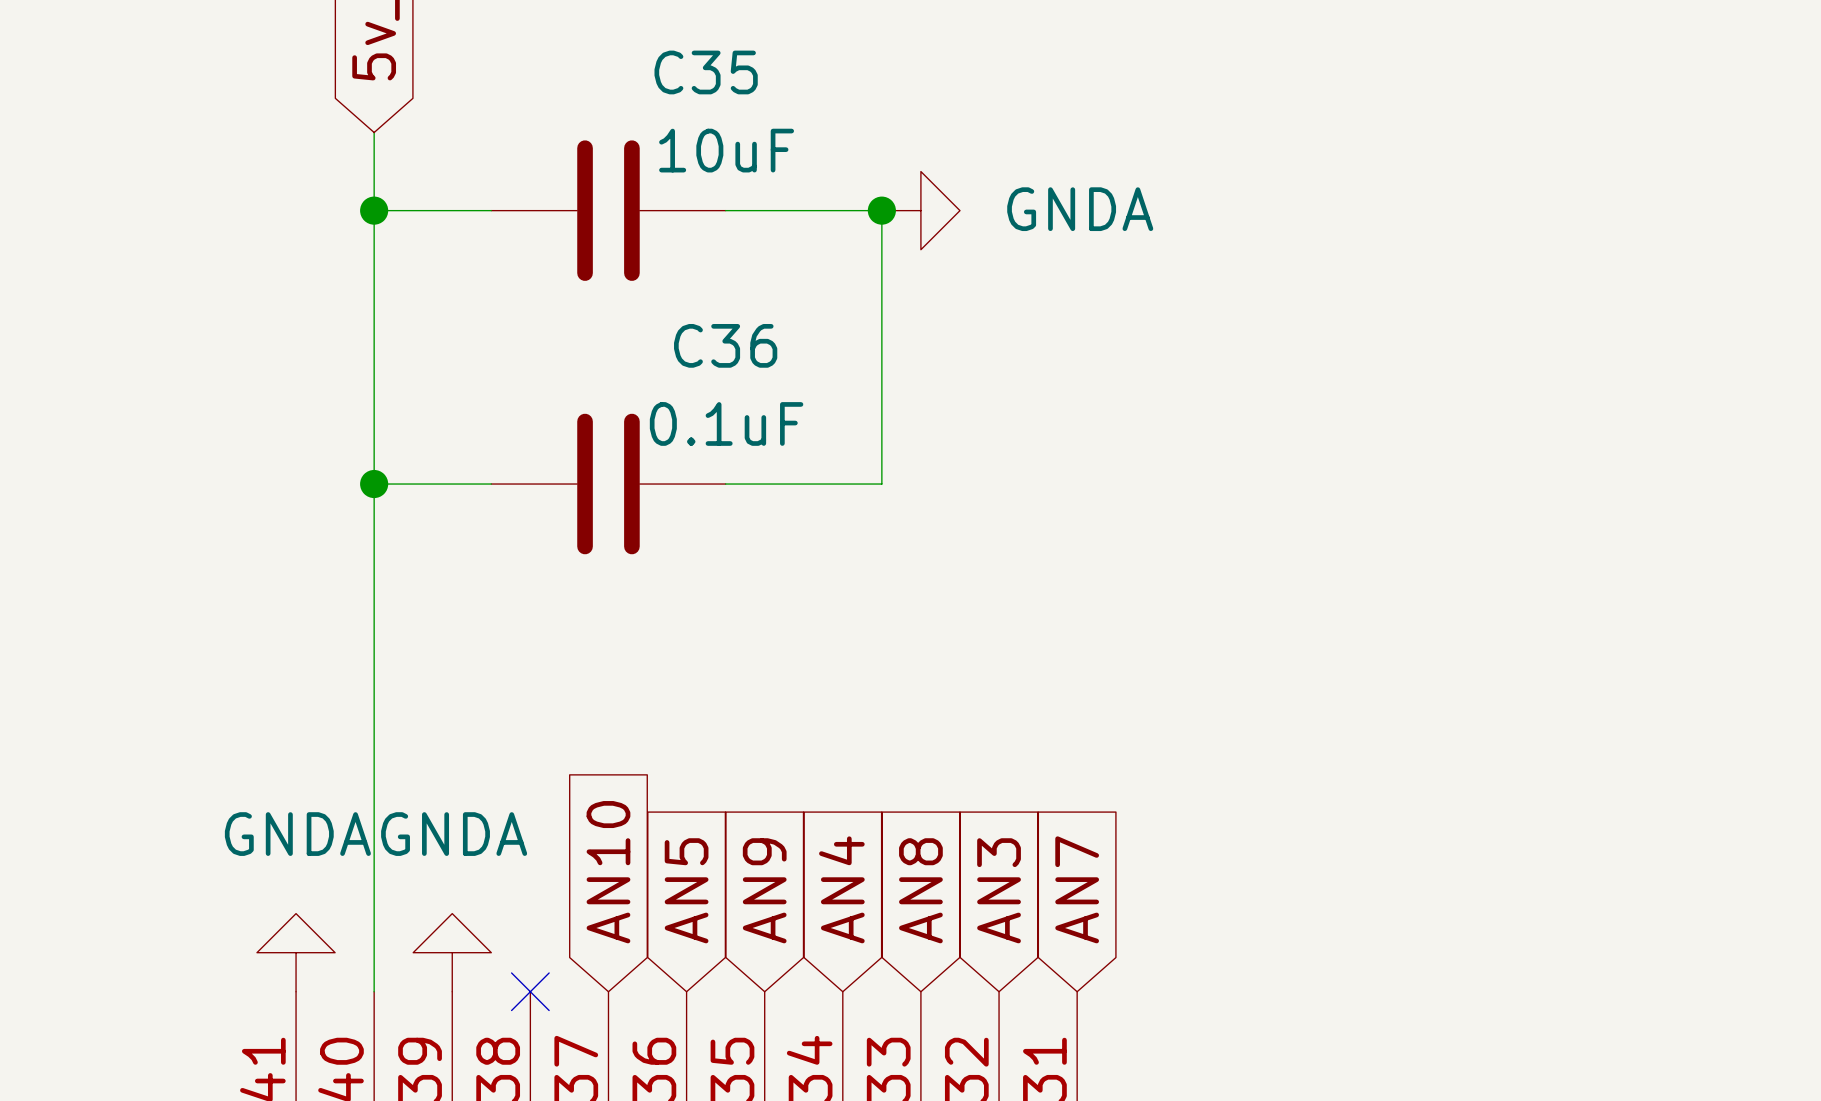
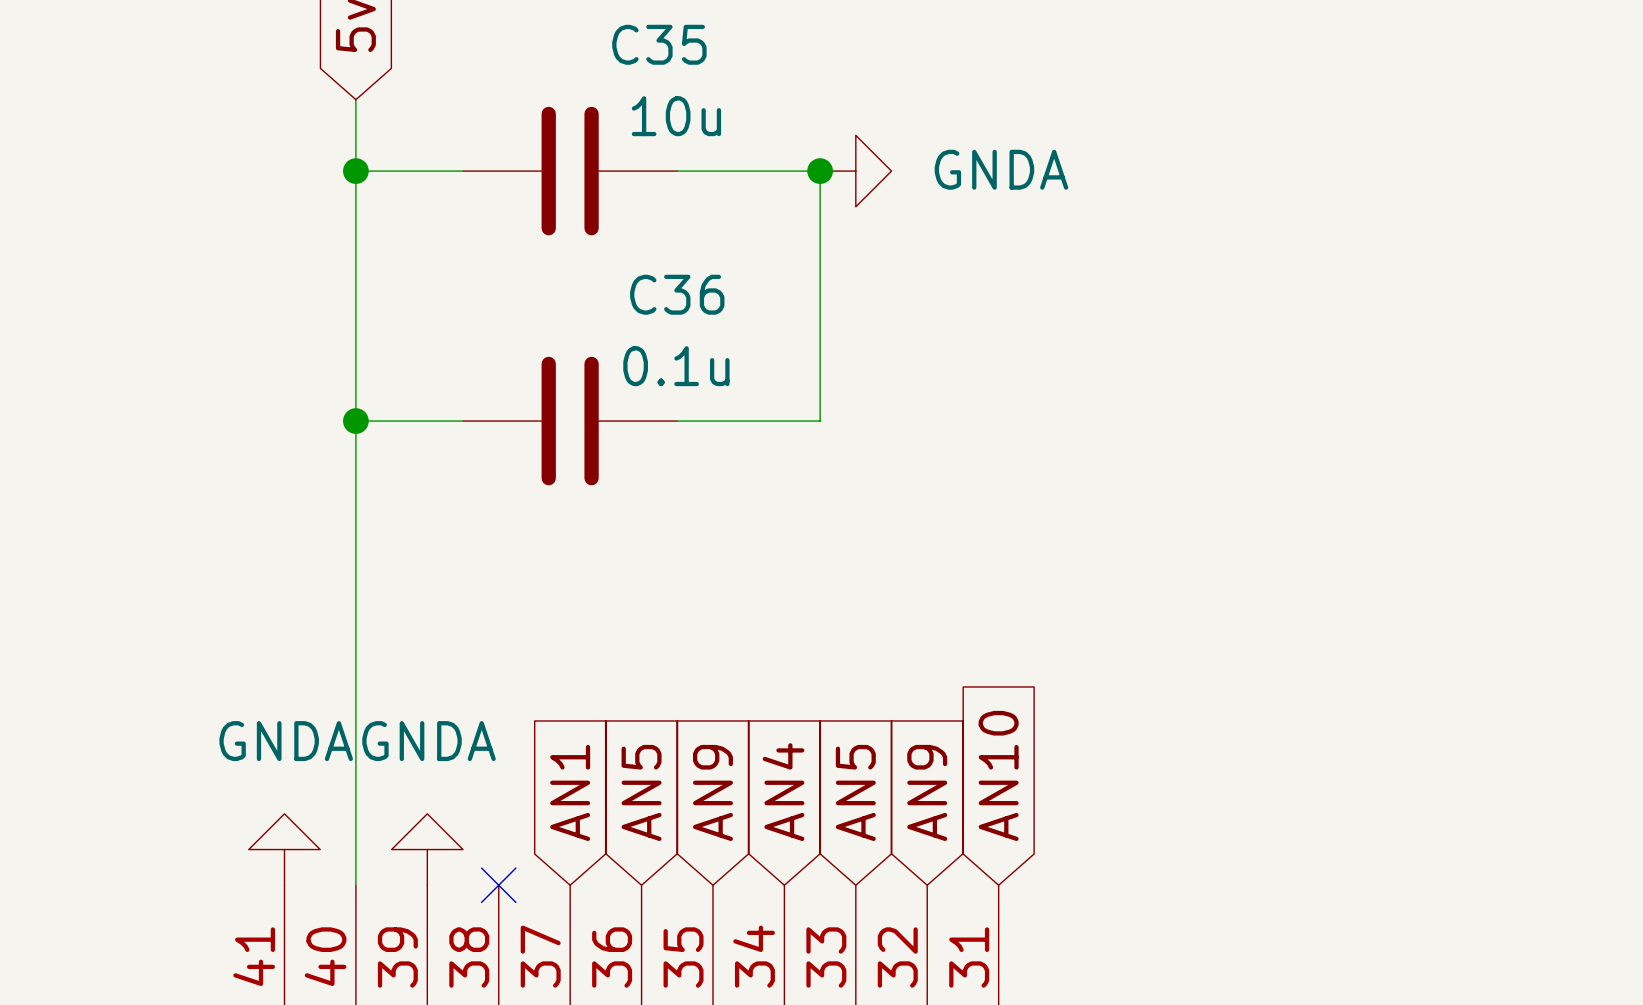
C35 value: 10uF (726, 150) -> 10u (676, 116)
C36 value: 0.1uF (726, 423) -> 0.1u (676, 366)
global label: AN10 (608, 872) -> AN1 (570, 792)
global label: AN7 (1077, 889) -> AN10 (998, 775)
global label: AN8 (920, 890) -> AN5 (855, 792)
global label: AN3 (999, 890) -> AN9 (927, 792)

